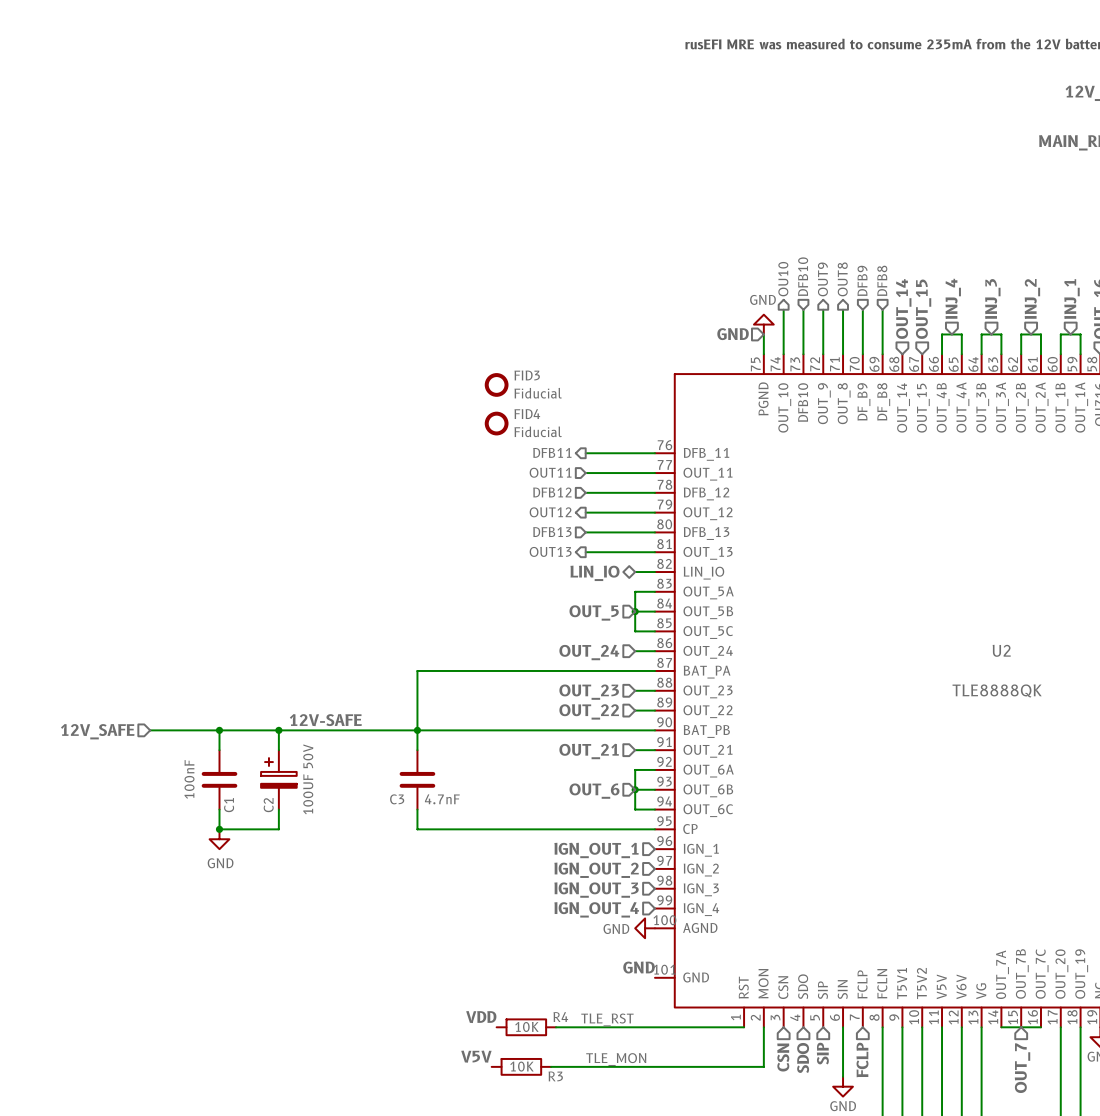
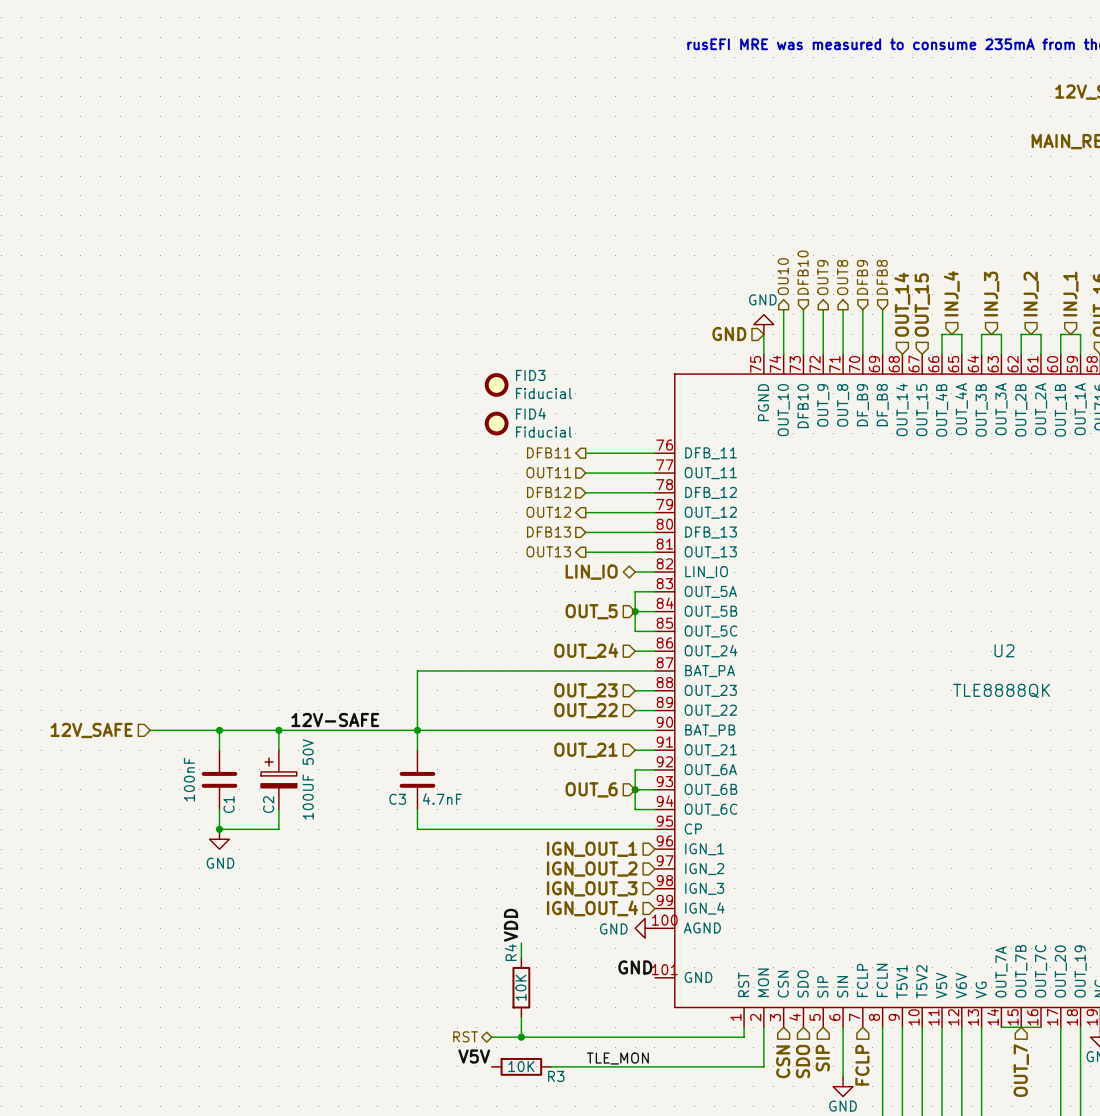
wire: none -> (521, 943) (521, 958)
label rotation: 0° (481, 1017) -> 90° counterclockwise (511, 925)
label position: VDD (481, 1017) -> VDD (511, 925)
wire: none -> (521, 1017) (521, 1037)
R4 name position: R4 (560, 1017) -> R4 (510, 952)
label: TLE_RST (607, 1019) -> none
R4 rotation: 0° (526, 1027) -> 90° clockwise (521, 987)
R4 position: (526, 1027) -> (521, 987)
wire: (556, 1027) (744, 1027) -> (491, 1037) (744, 1037) (744, 1027)
hierarchical label: none -> RST (465, 1036)
junction: none -> (521, 1037)

